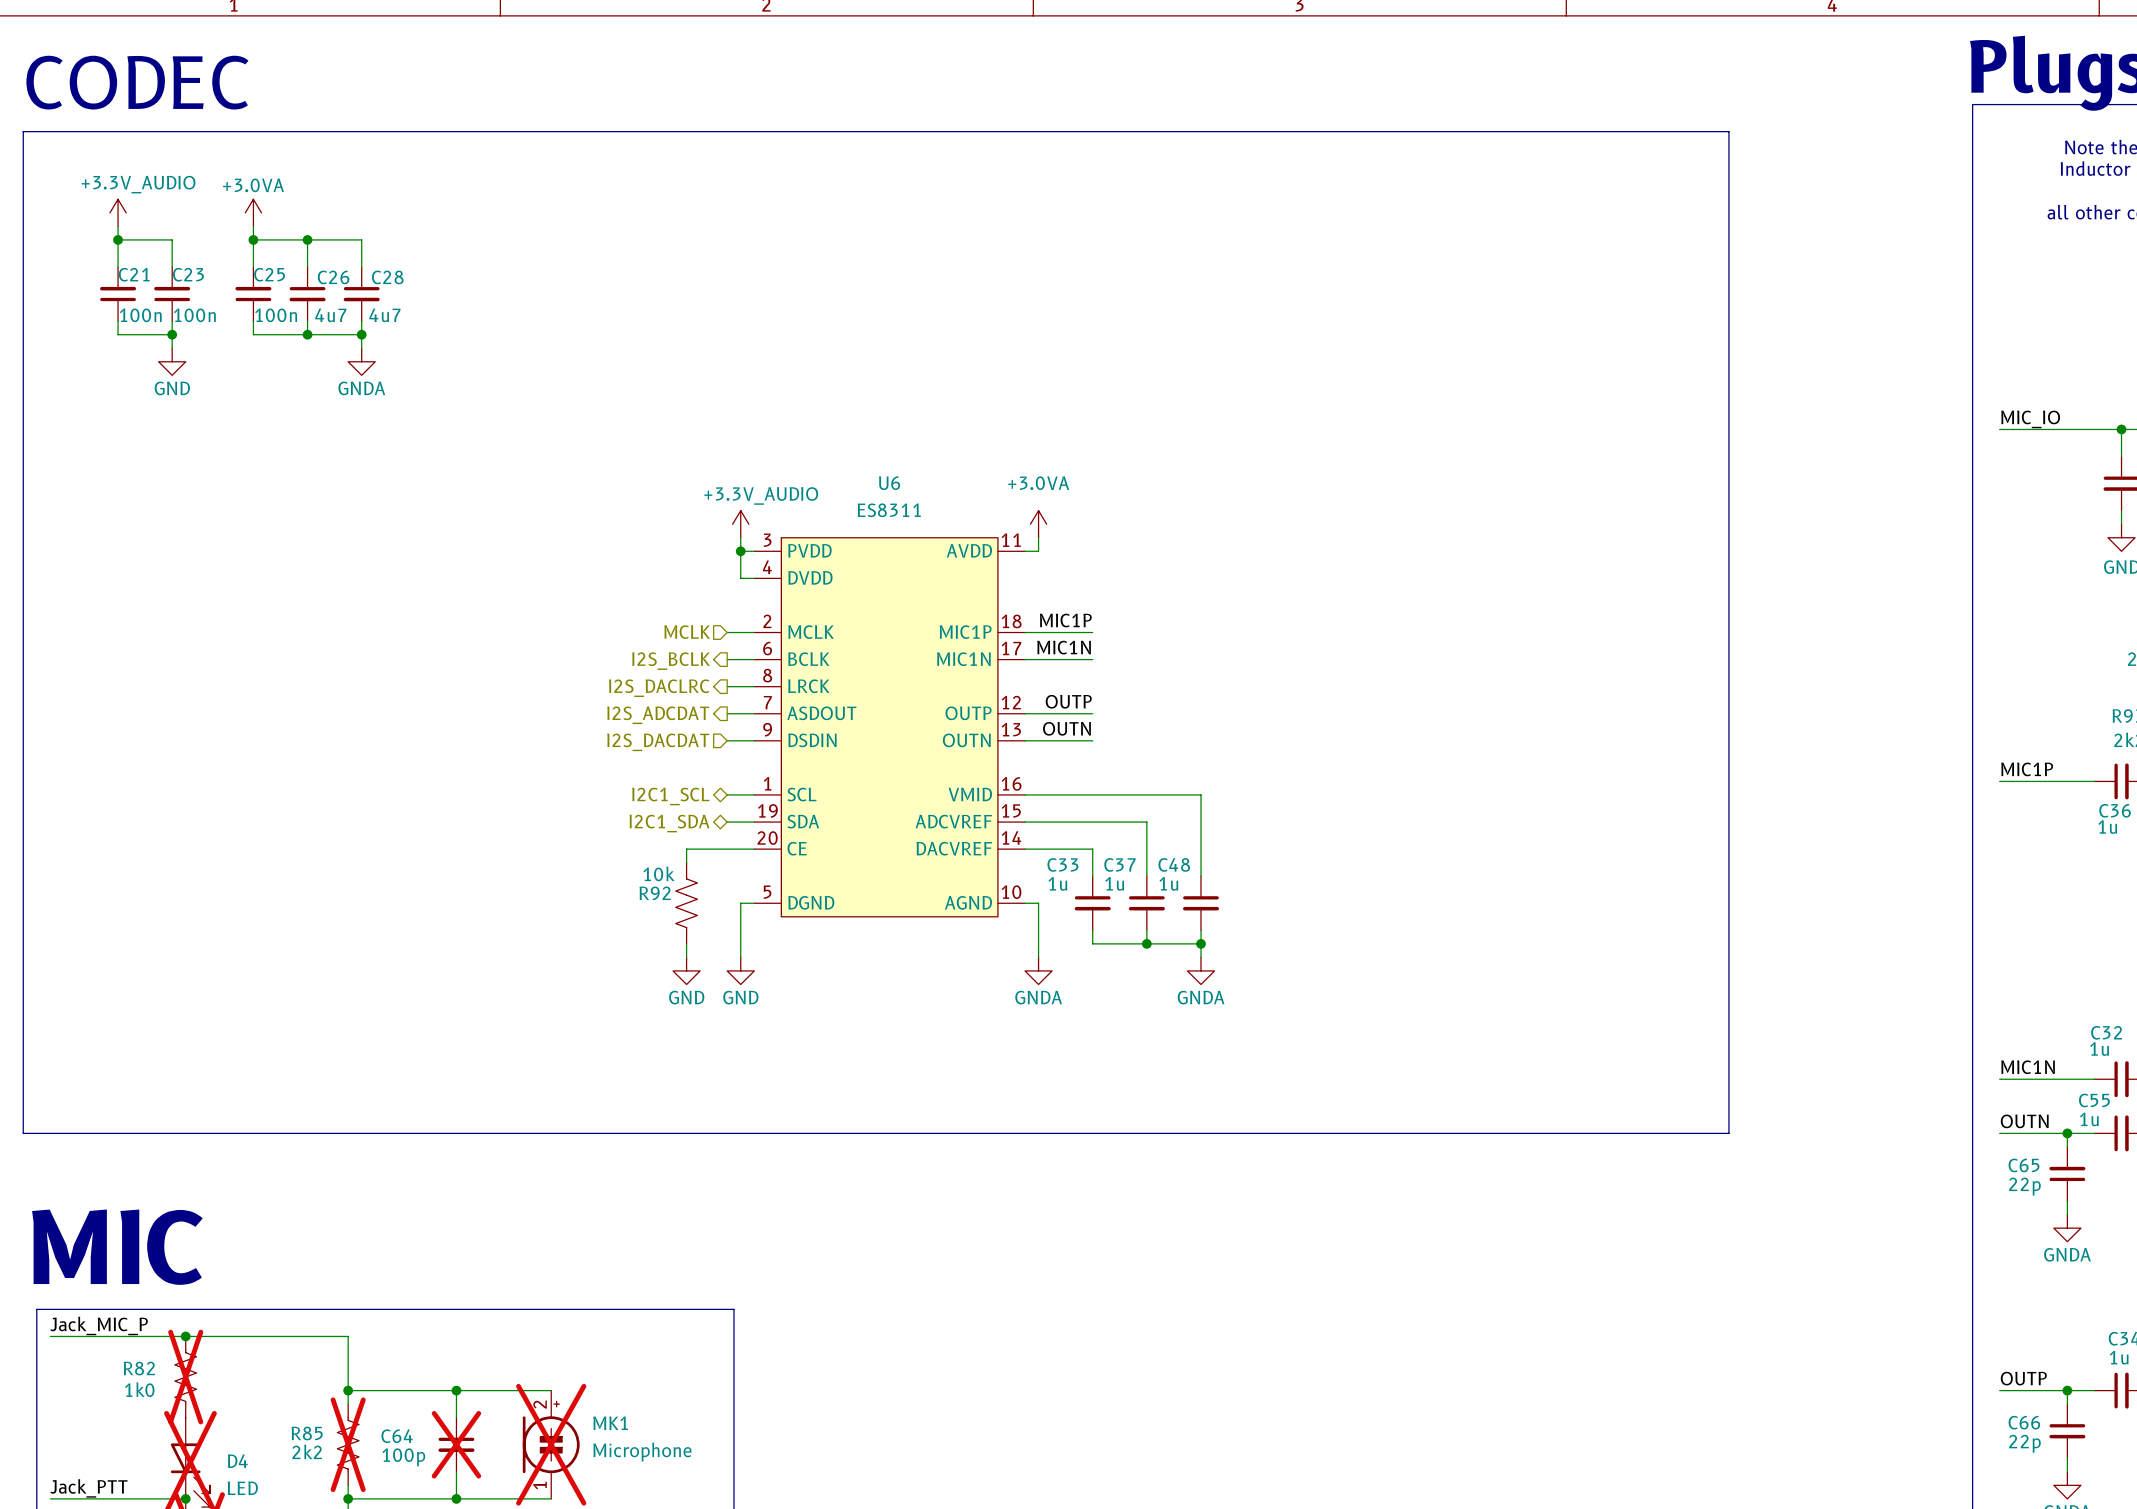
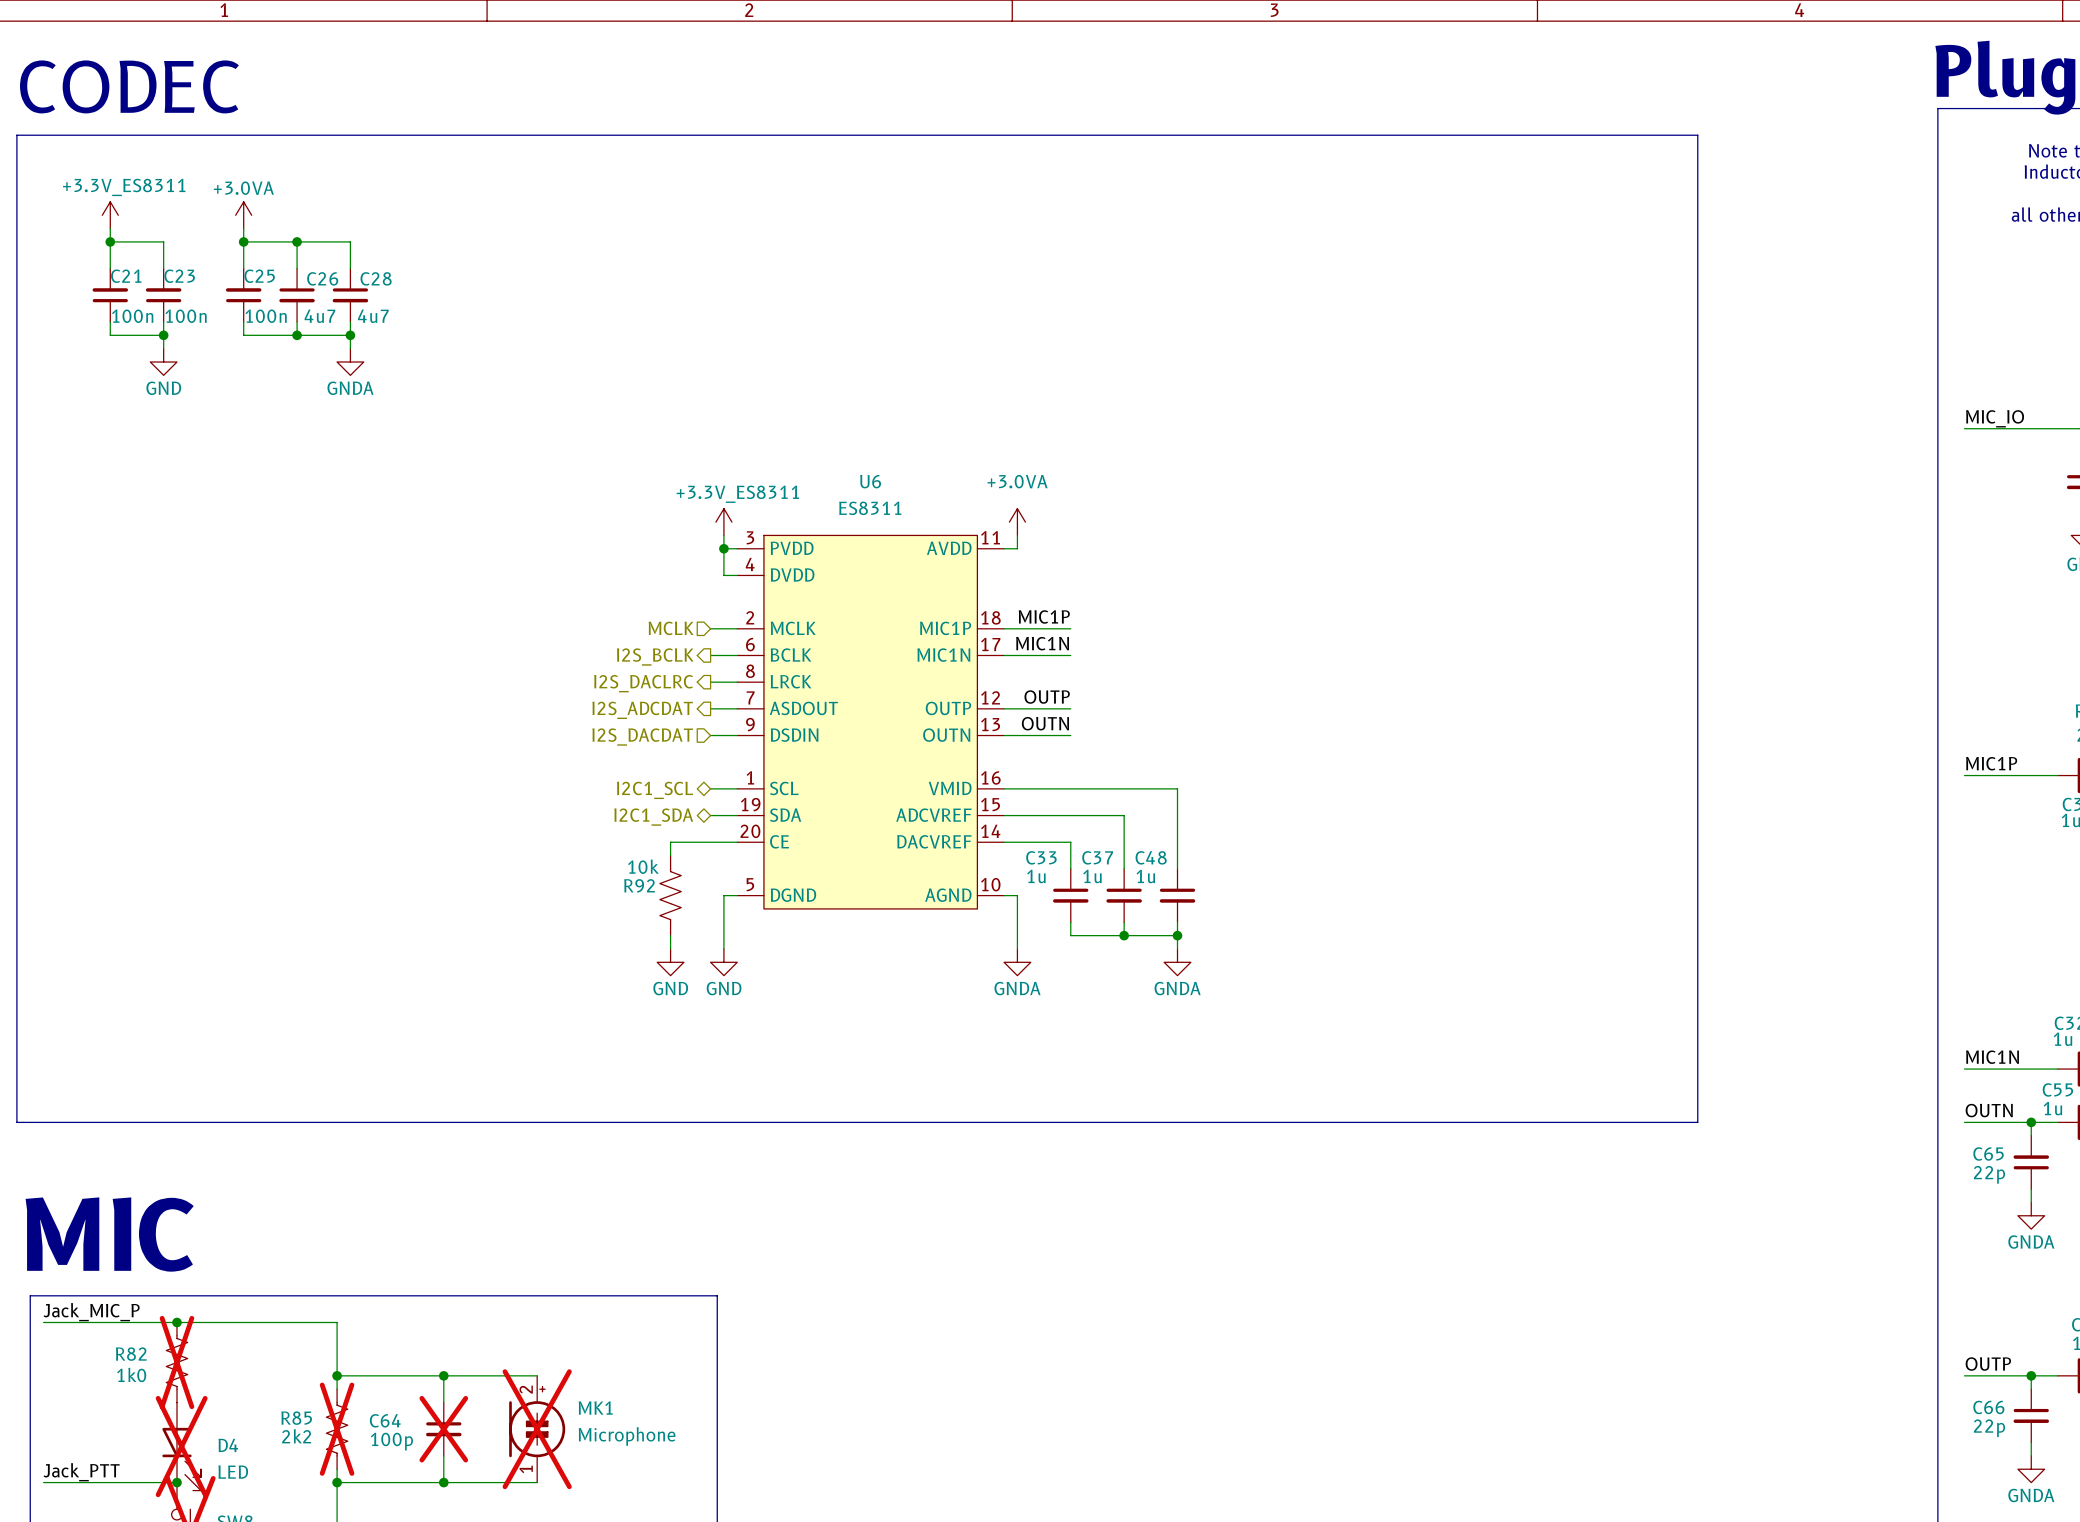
power symbol: +3.3V_AUDIO (118, 212) -> +3.3V_ES8311 (110, 215)
power symbol: +3.3V_AUDIO (740, 524) -> +3.3V_ES8311 (723, 522)

